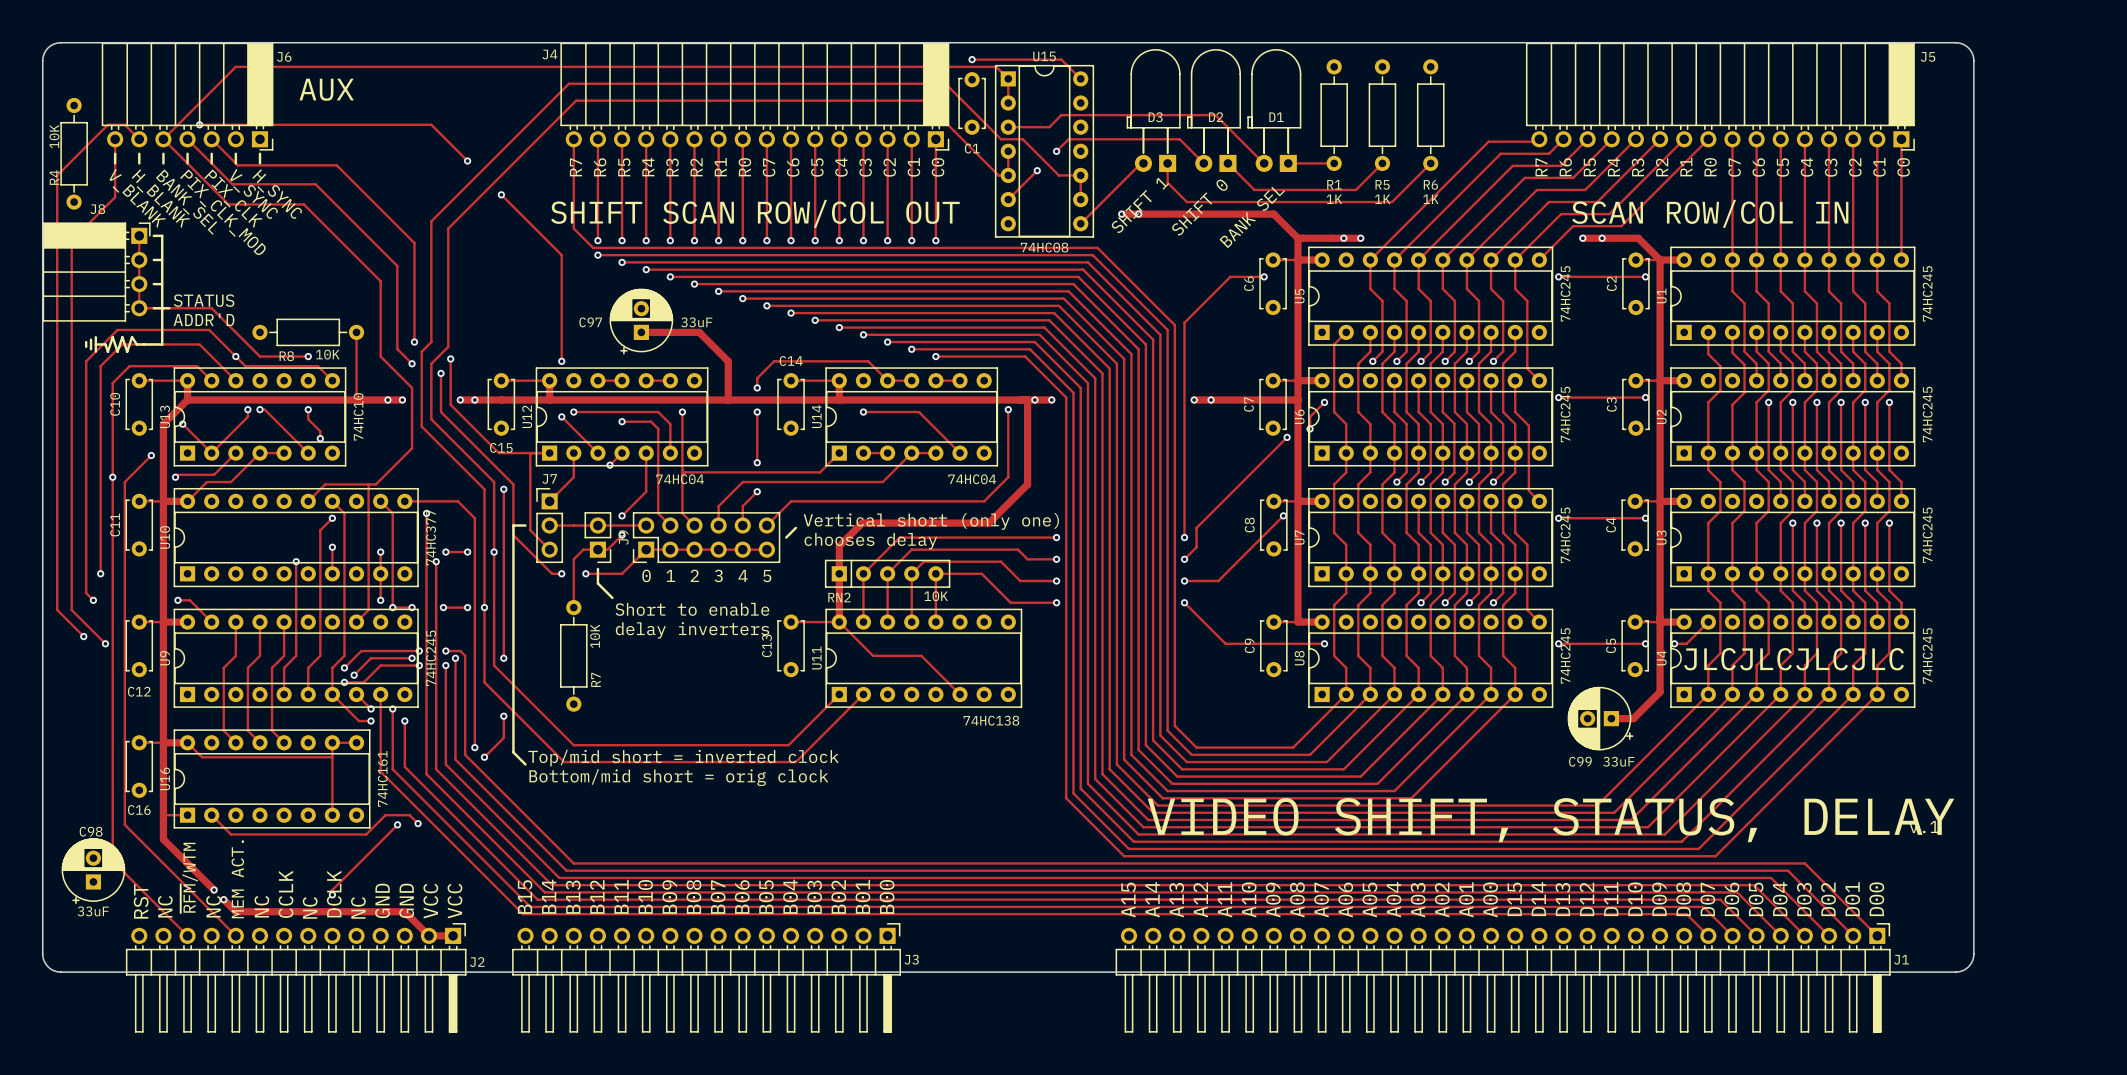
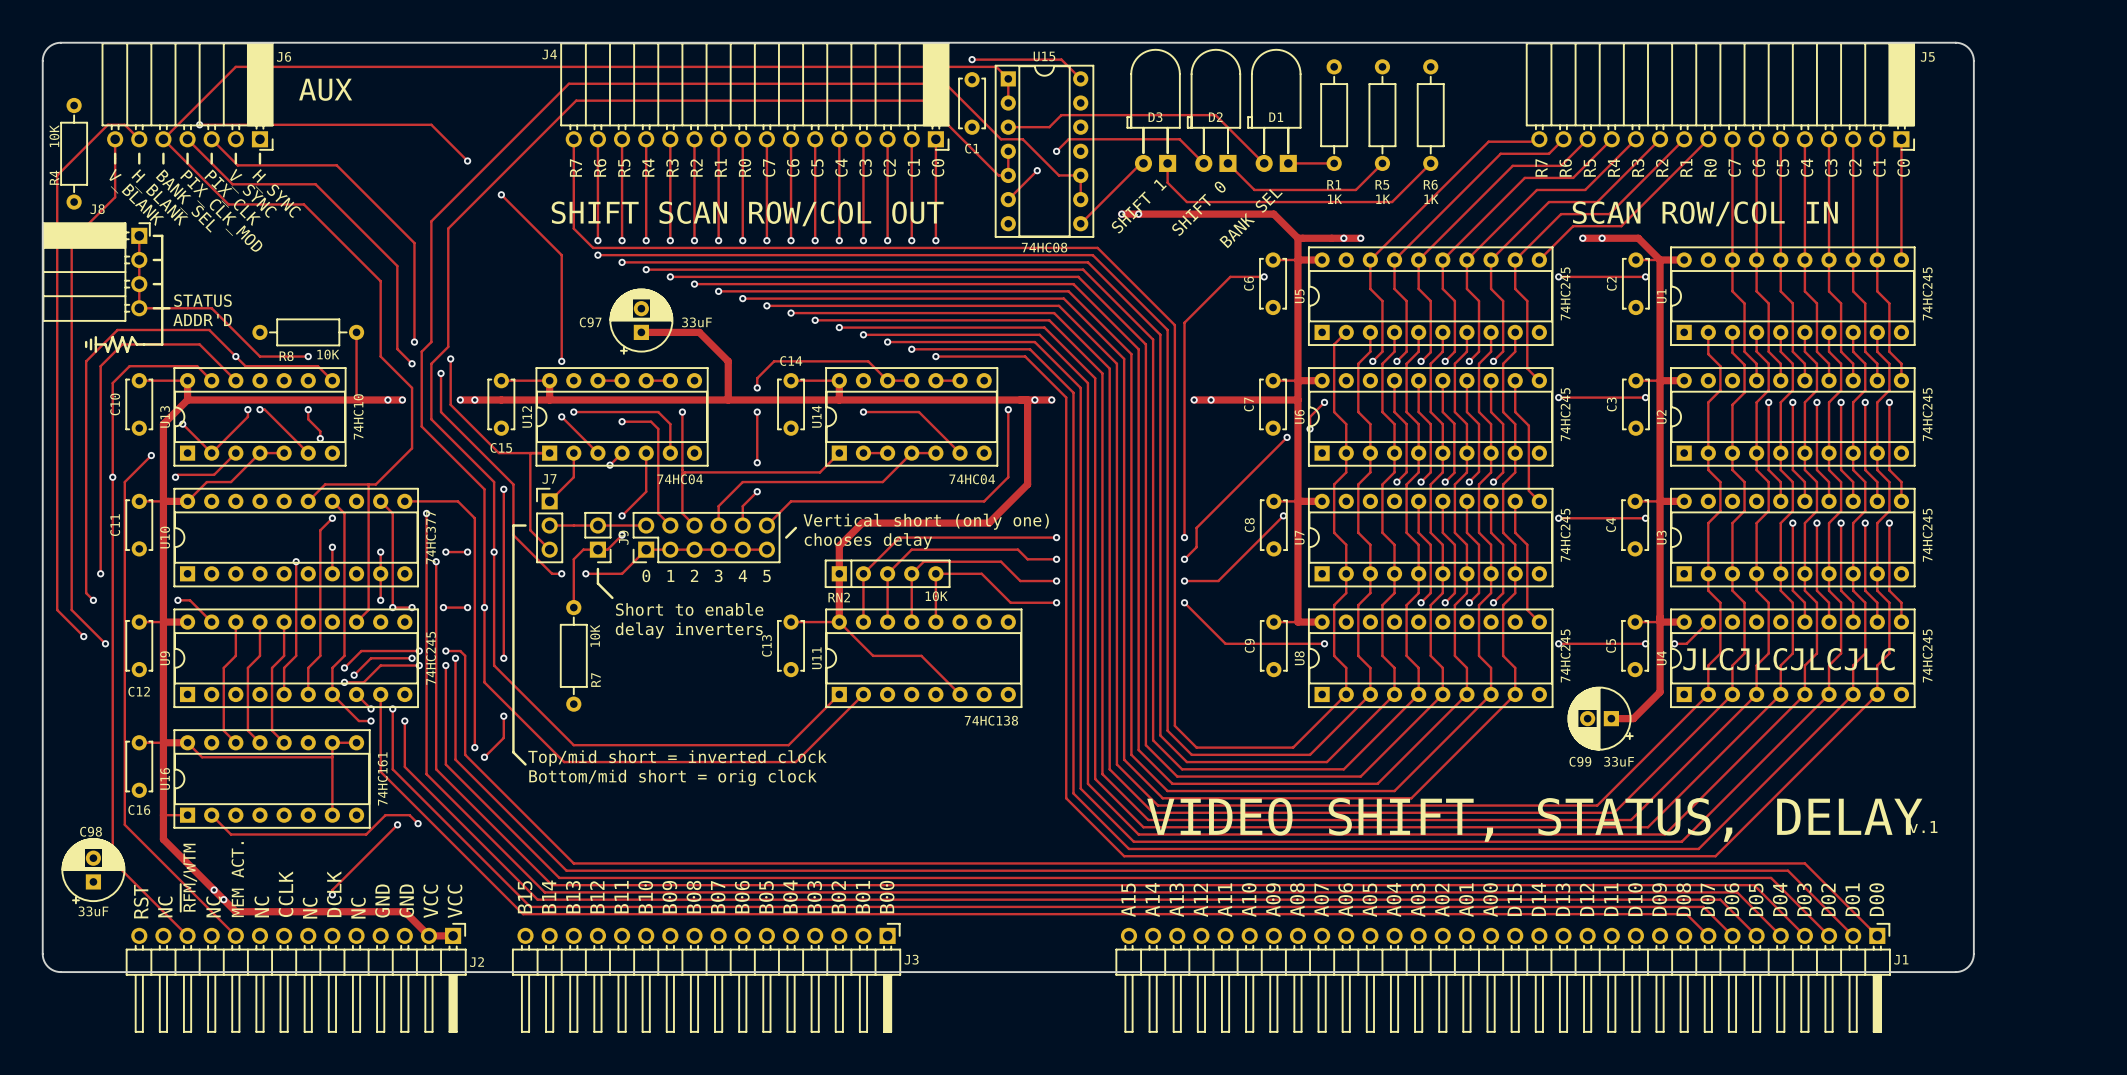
track: none -> (214, 890) (223, 899)

